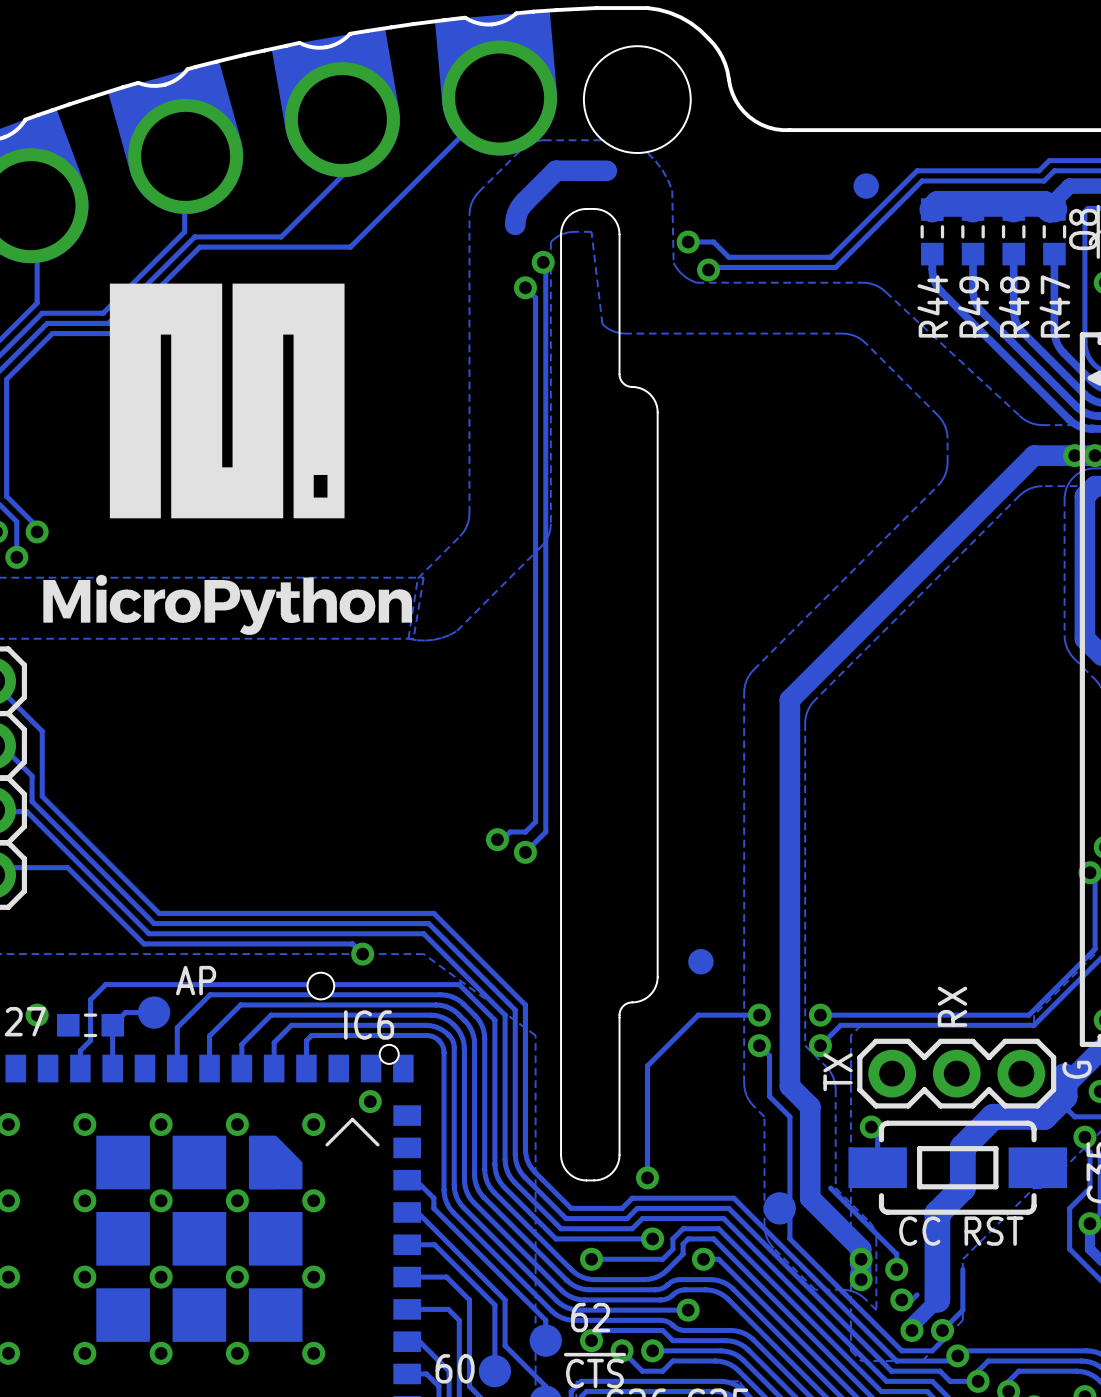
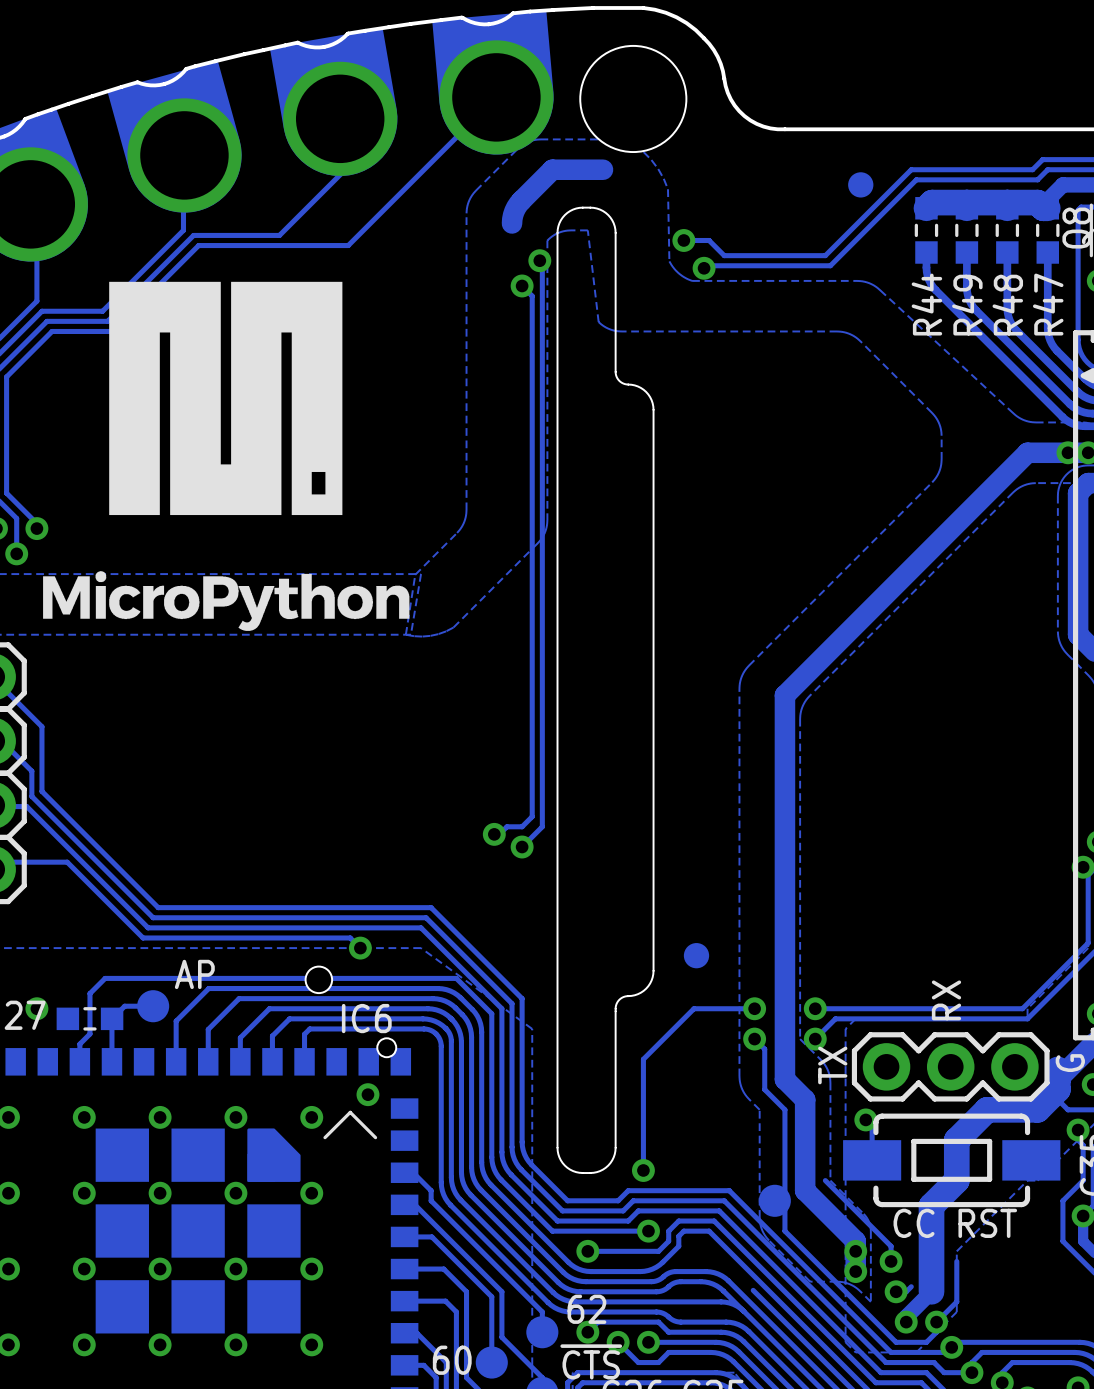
track: (703, 1259) (718, 1259) (757, 1298) -> none
via: (703, 1259) -> none
track: none -> (683, 1301) (725, 1302) (733, 1304) (743, 1311)
via: (688, 1310) -> none

